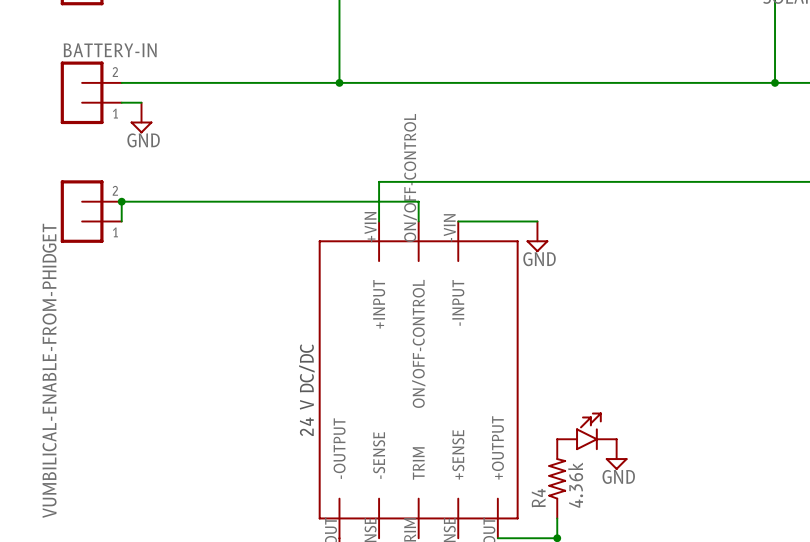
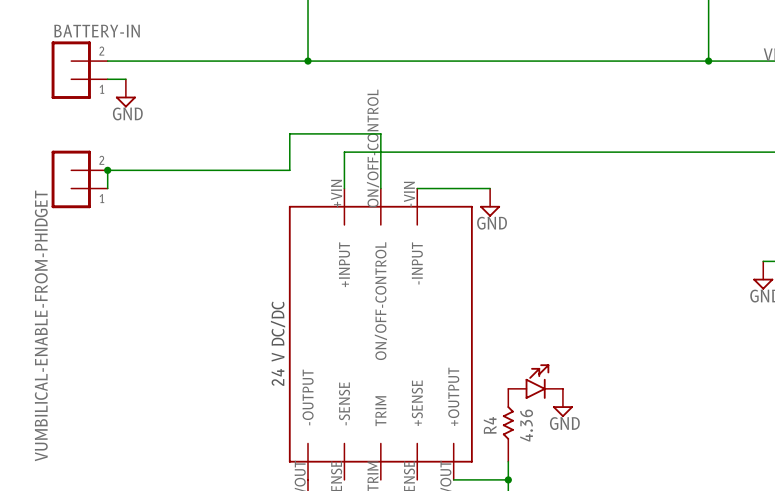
wire: (319, 201) (418, 201) -> (289, 170) (289, 133) (380, 133) (380, 170)
R4 symbol: [548, 439, 566, 519] -> [502, 388, 514, 463]
R4 value: 4.36k (575, 485) -> 4.36 (526, 425)

